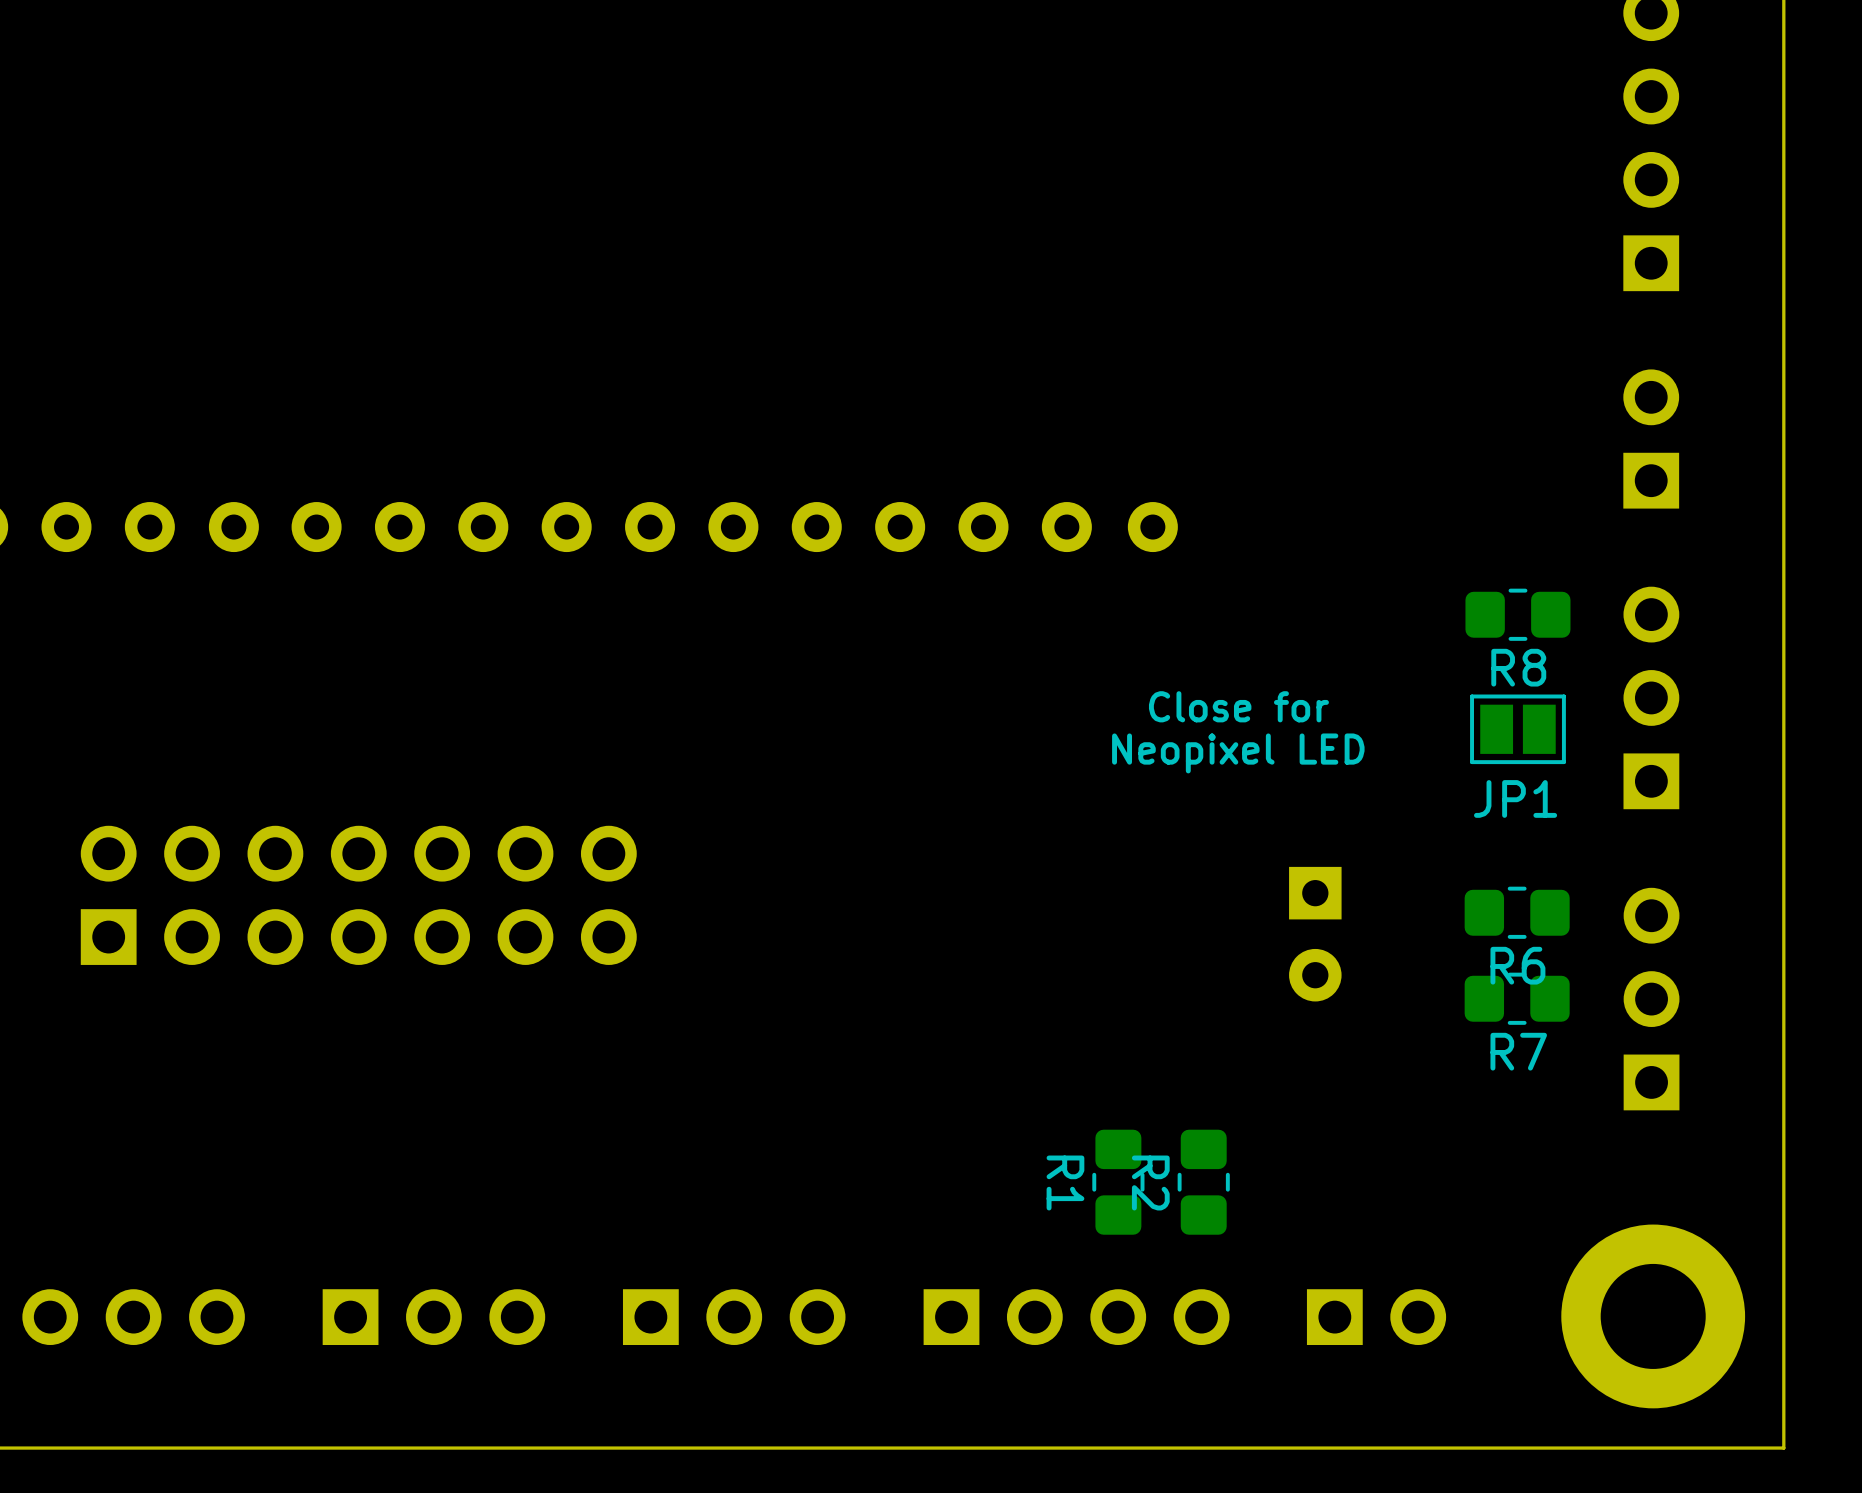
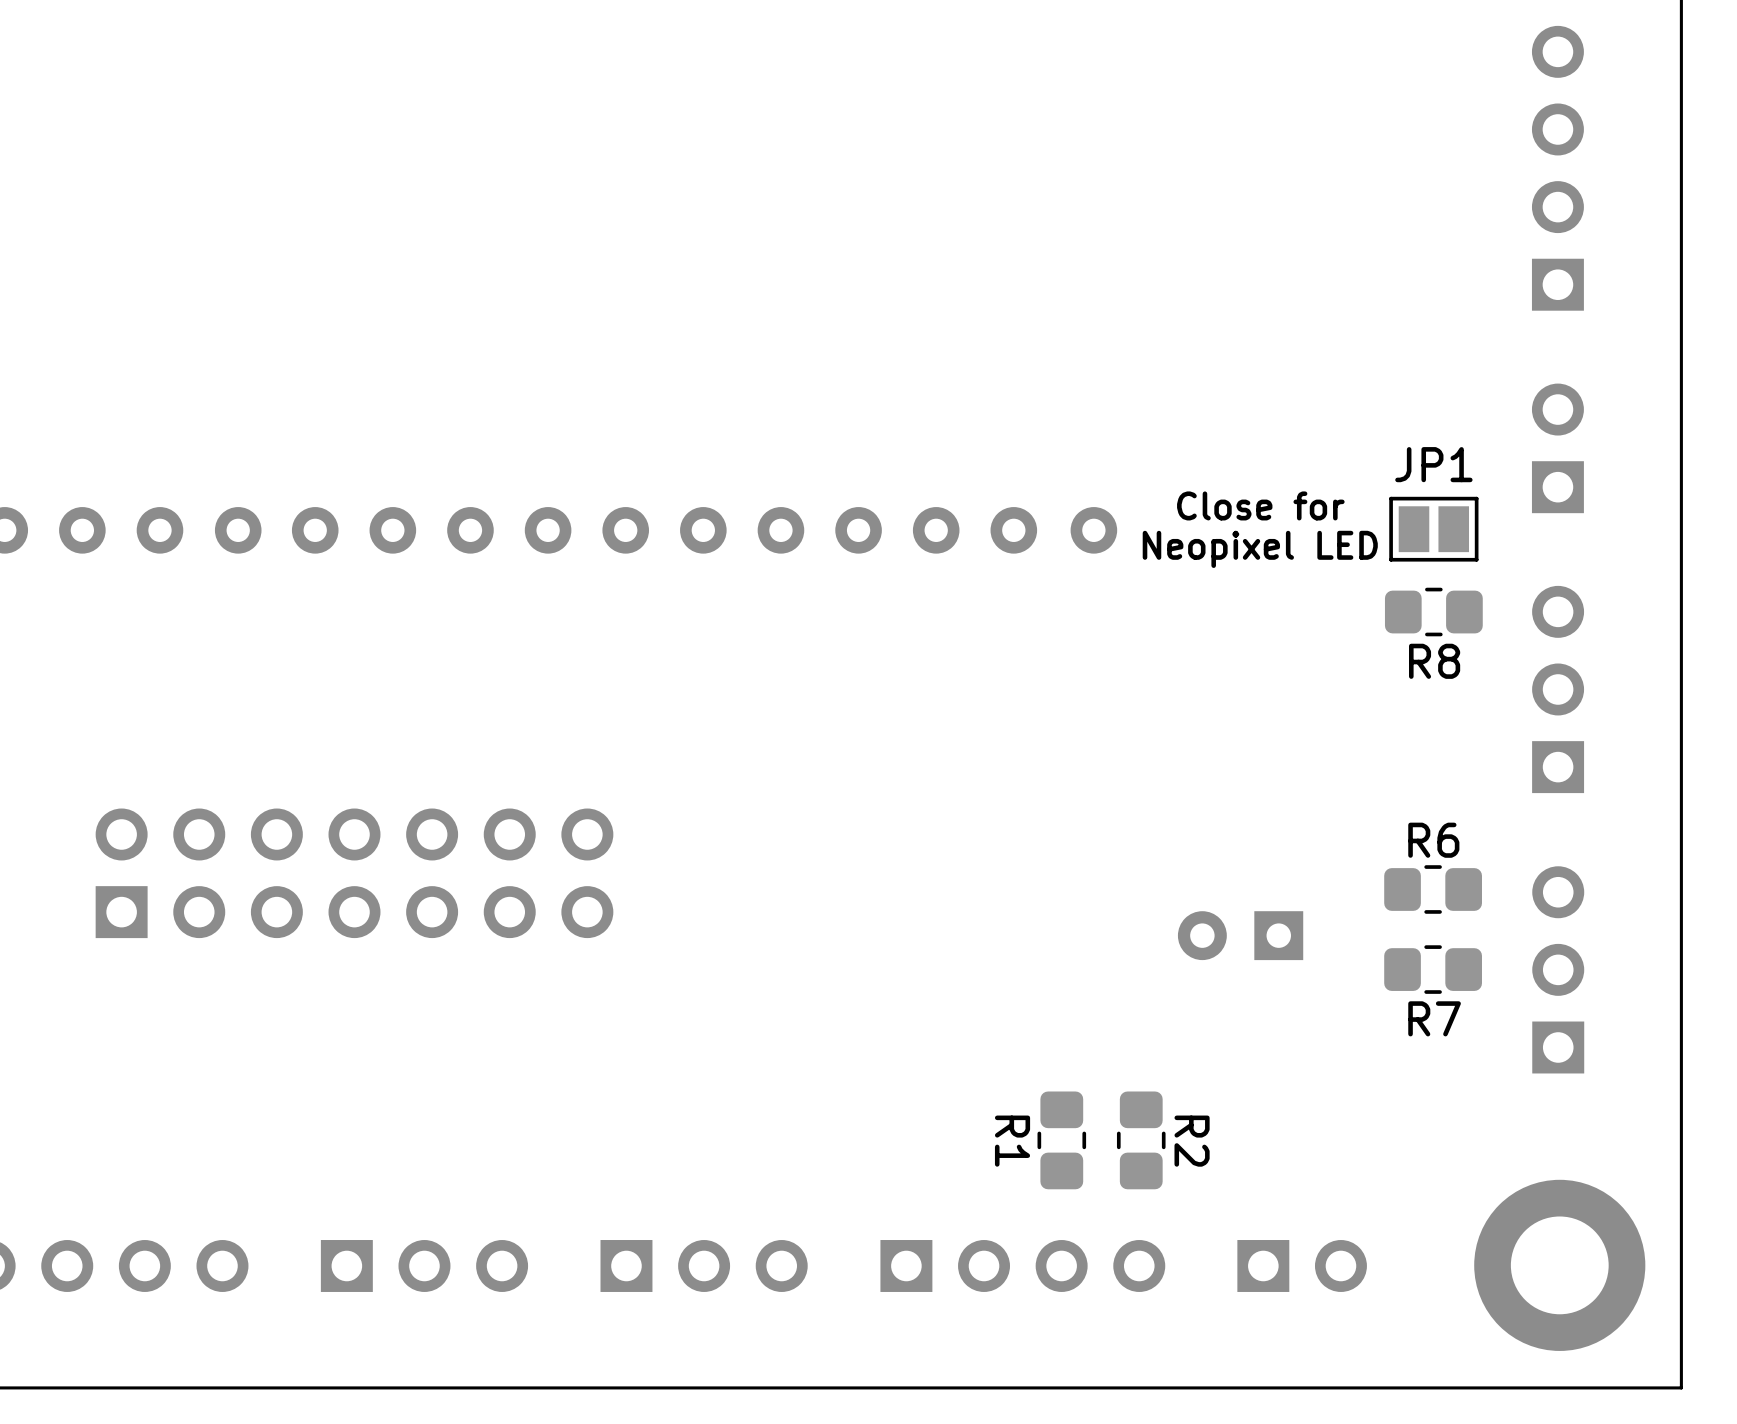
text position: Close for (1238, 706) -> Close for (1260, 505)
JP1 position: (1517, 729) -> (1433, 529)
text position: Neopixel LED (1238, 753) -> Neopixel LED (1260, 549)
JP1 name position: JP1 (1515, 798) -> JP1 (1433, 464)
part rotation: 0° (1315, 934) -> 90° clockwise (1240, 935)
R6 name position: R6 (1517, 965) -> R6 (1433, 840)
R2 name position: R2 (1150, 1182) -> R2 (1192, 1141)

